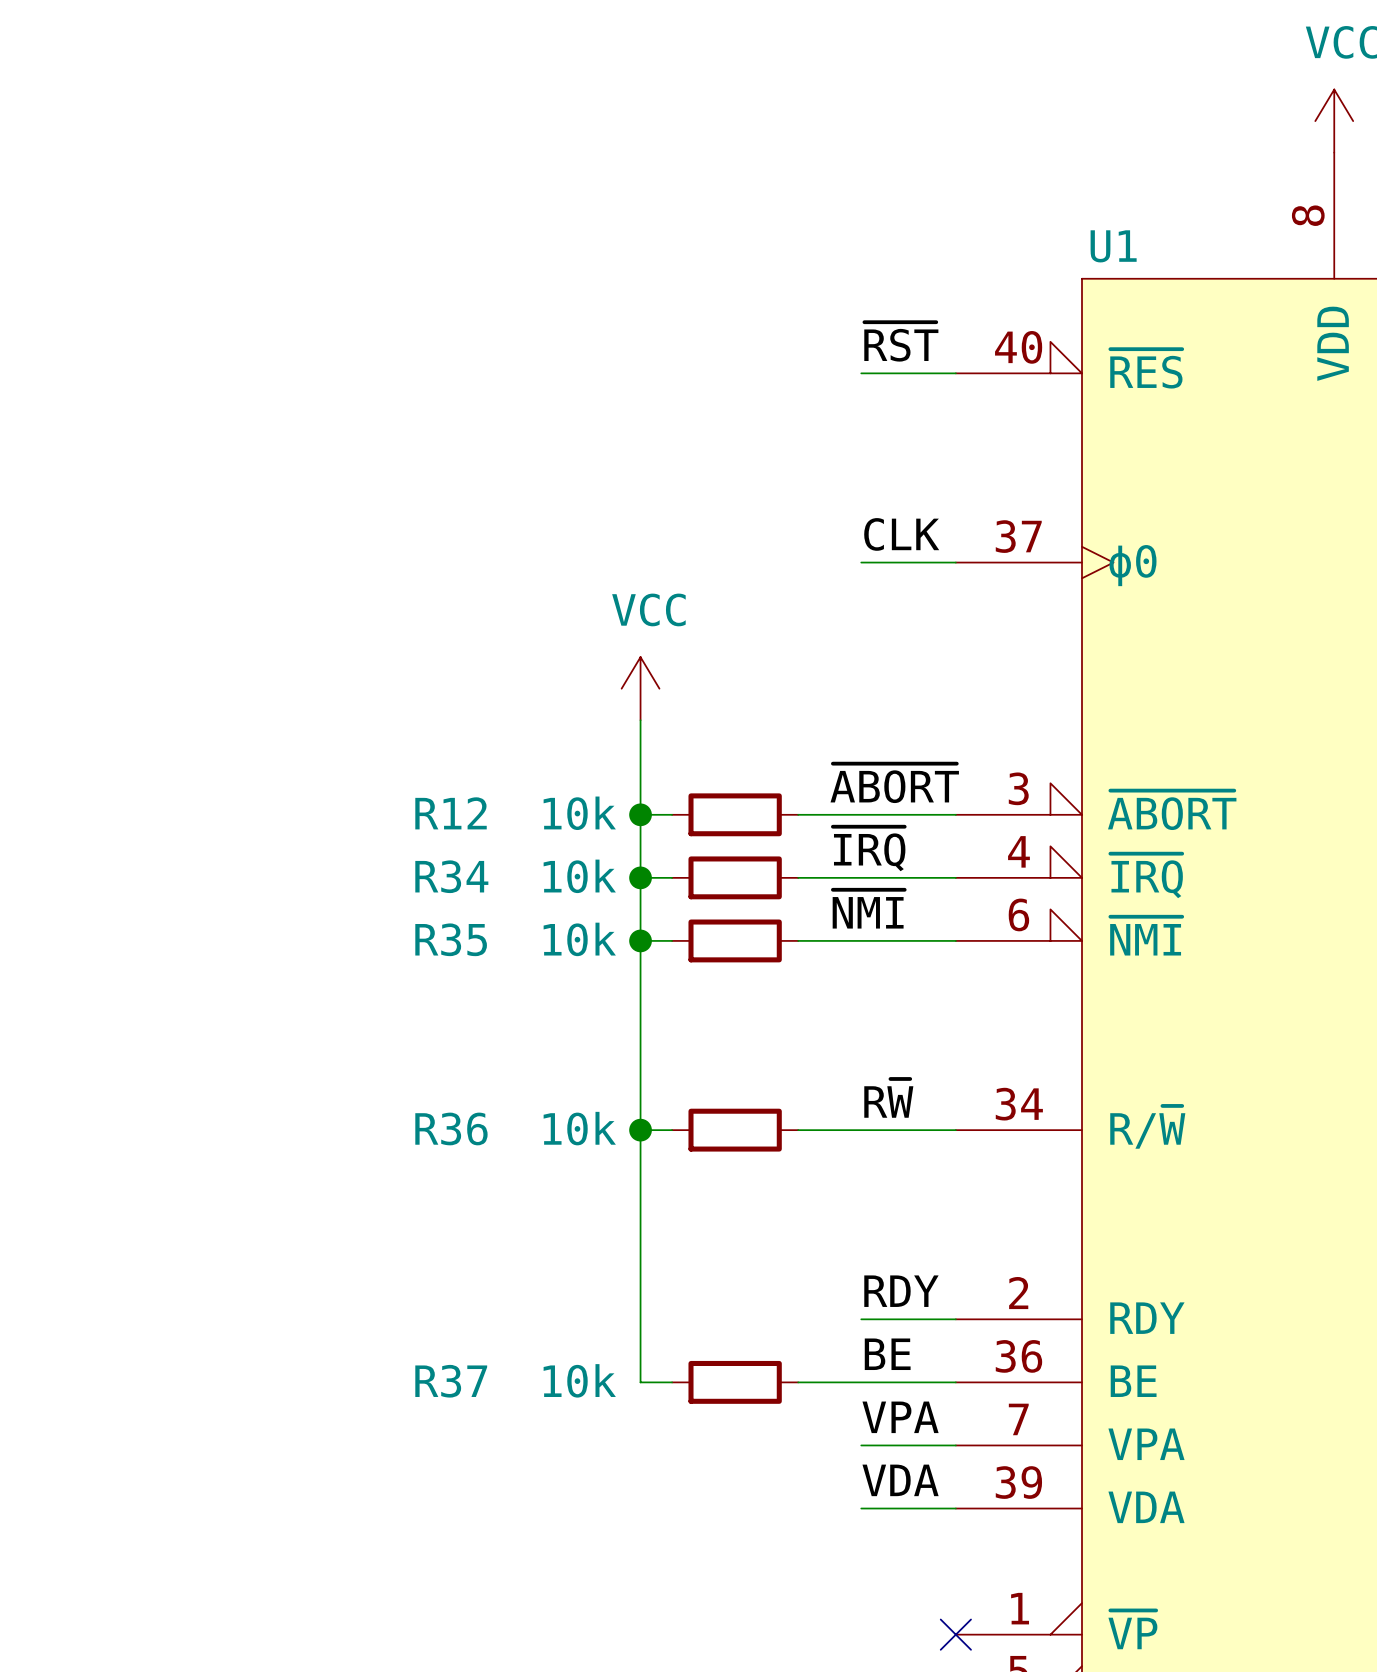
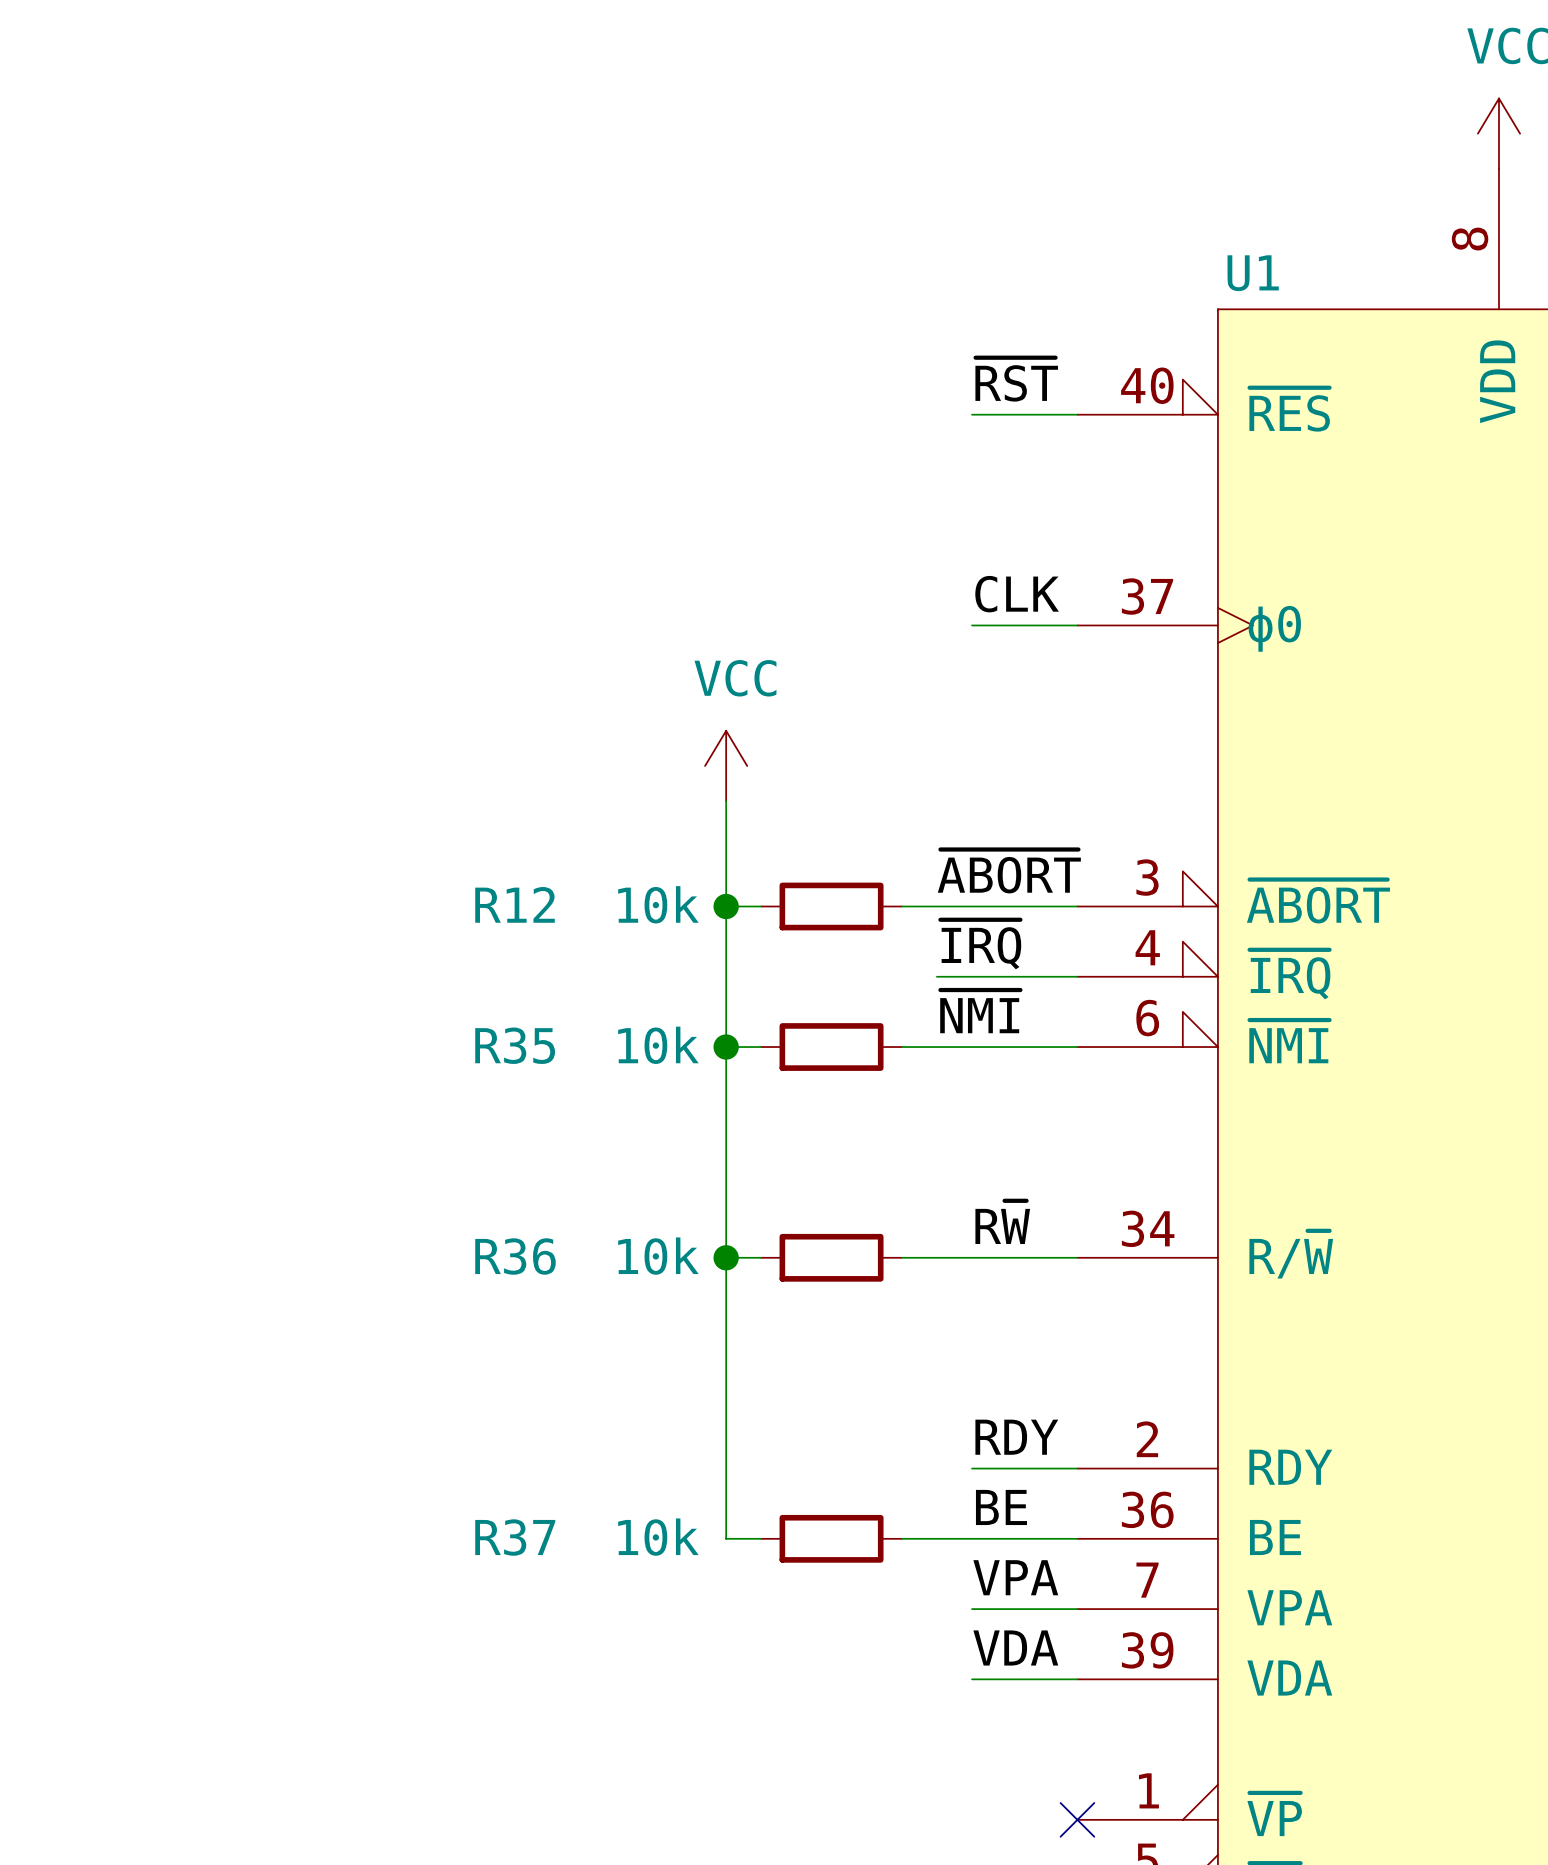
wire: (640, 877) (672, 877) -> none
junction: (640, 877) -> none
R34: 10k (735, 877) -> none
wire: (798, 877) (829, 877) -> none

